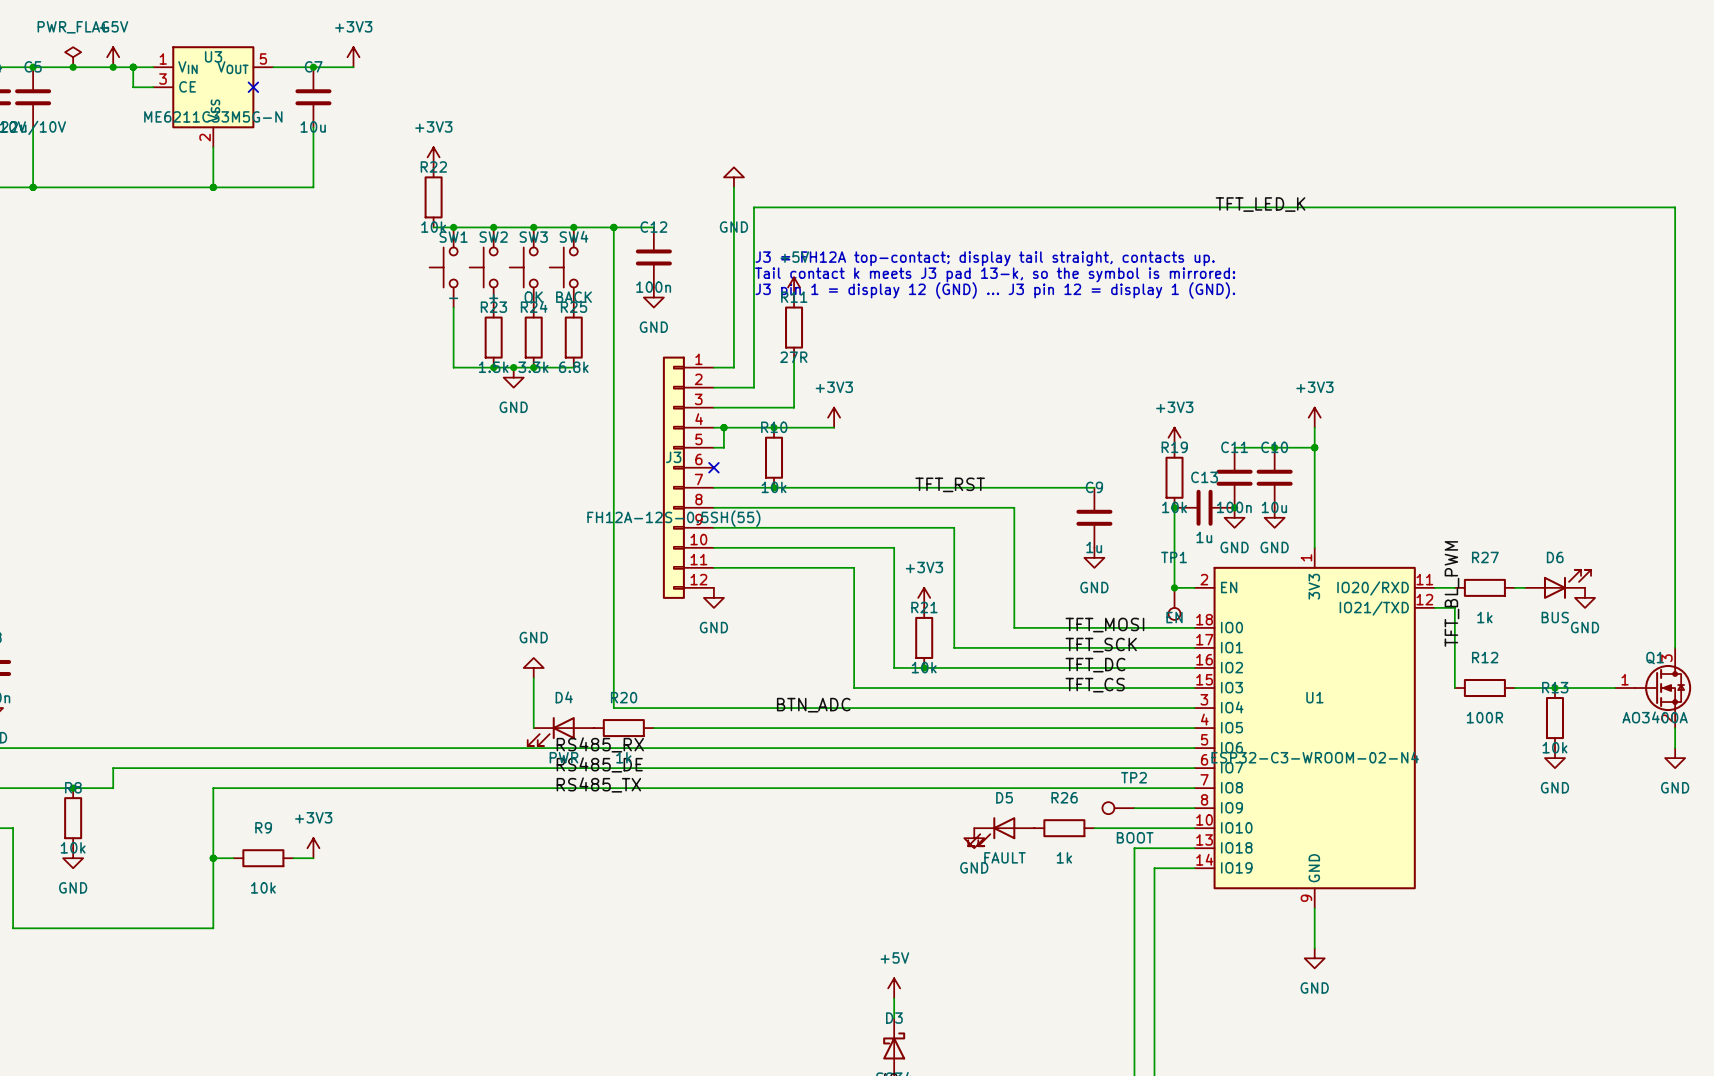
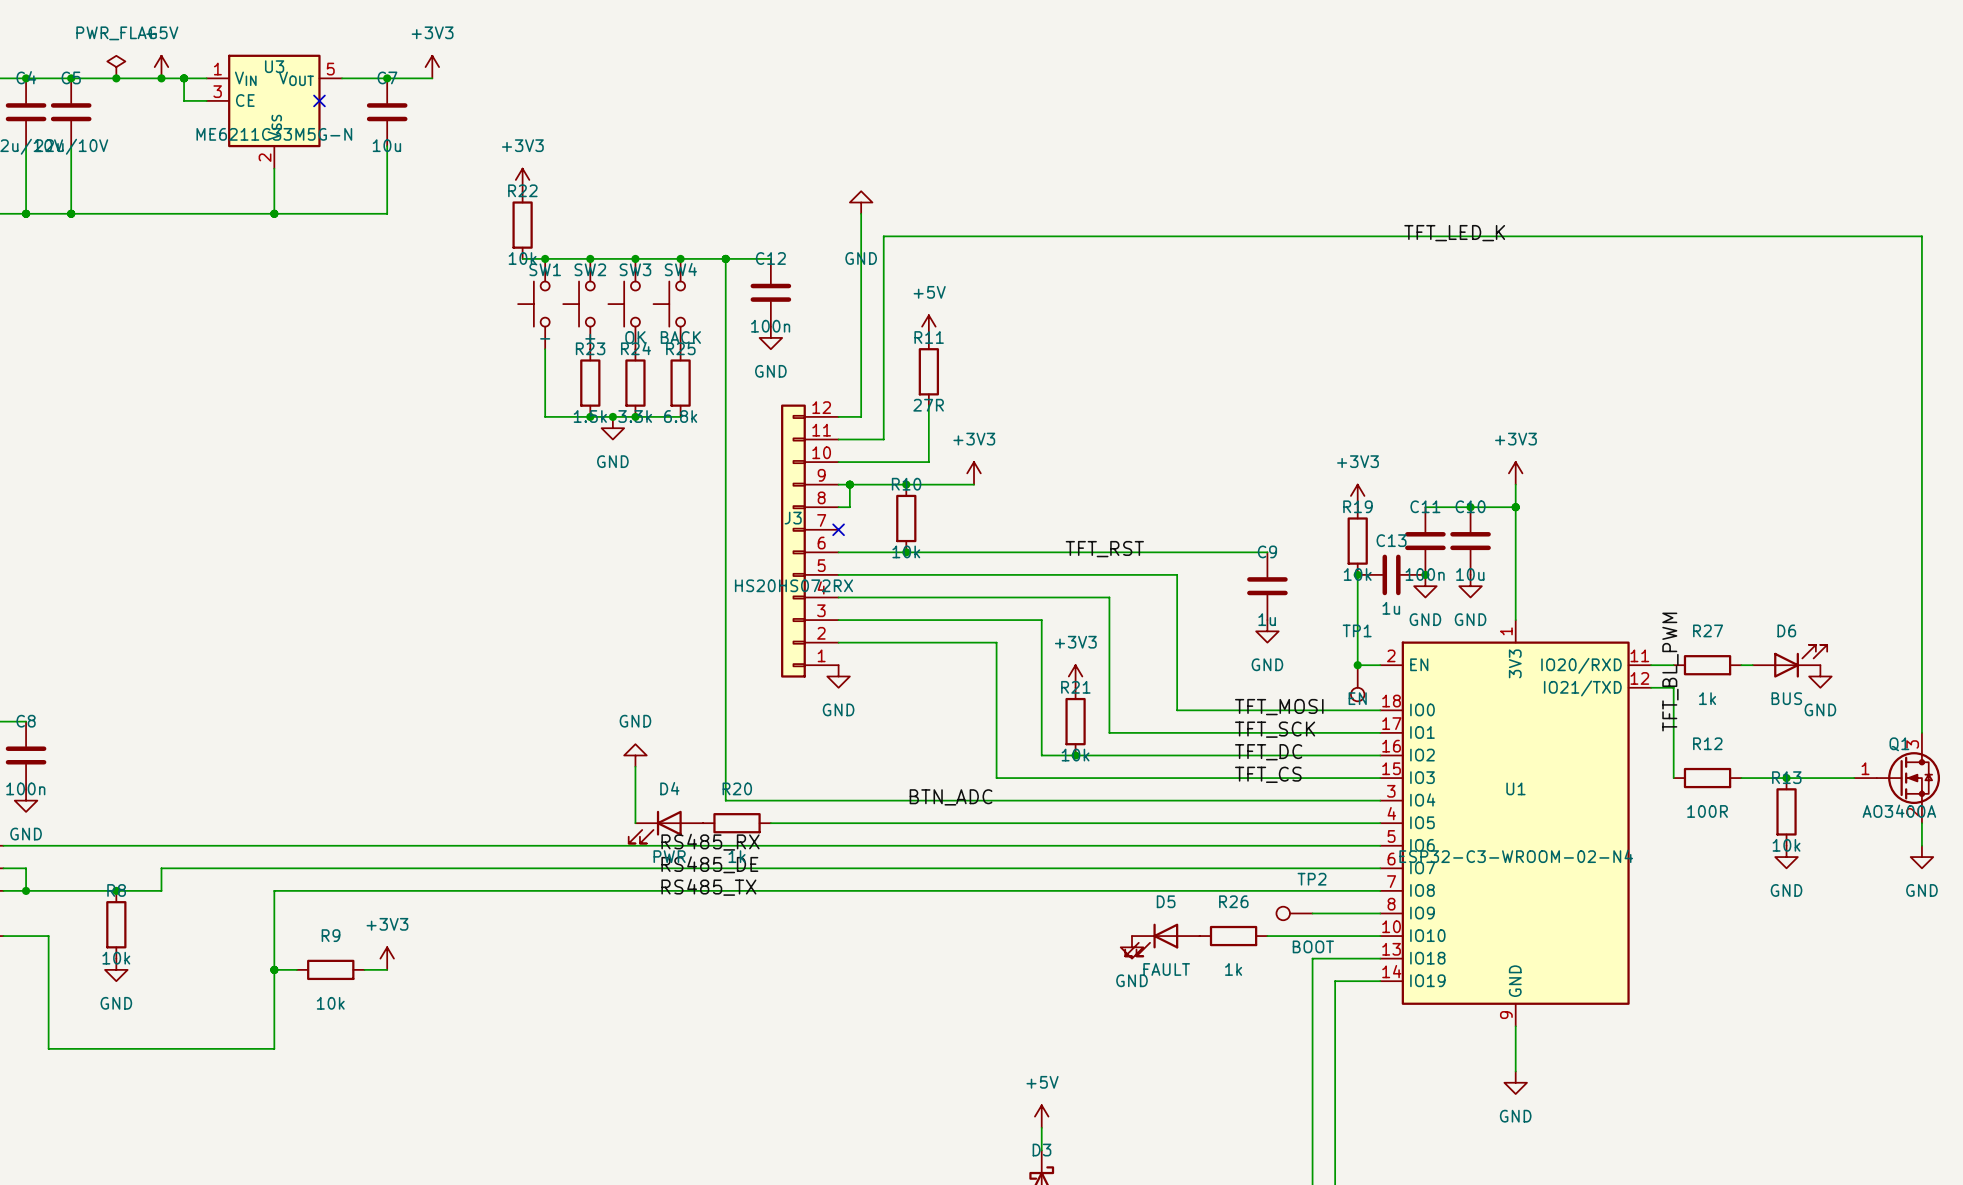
text: J3 = FH12A top-contact; display tail straight, contacts up. (985, 258) -> none
text: Tail contact k meets J3 pad 13-k, so the symbol is mirrored: (995, 274) -> none
text: J3 pin 1 = display 12 (GND) ... J3 pin 12 = display 1 (GND). (995, 290) -> none
J3 flip: as is (673, 477) -> up-down (793, 541)
J3 value: FH12A-12S-0.5SH(55) (673, 518) -> HS20HS072RX (793, 585)

